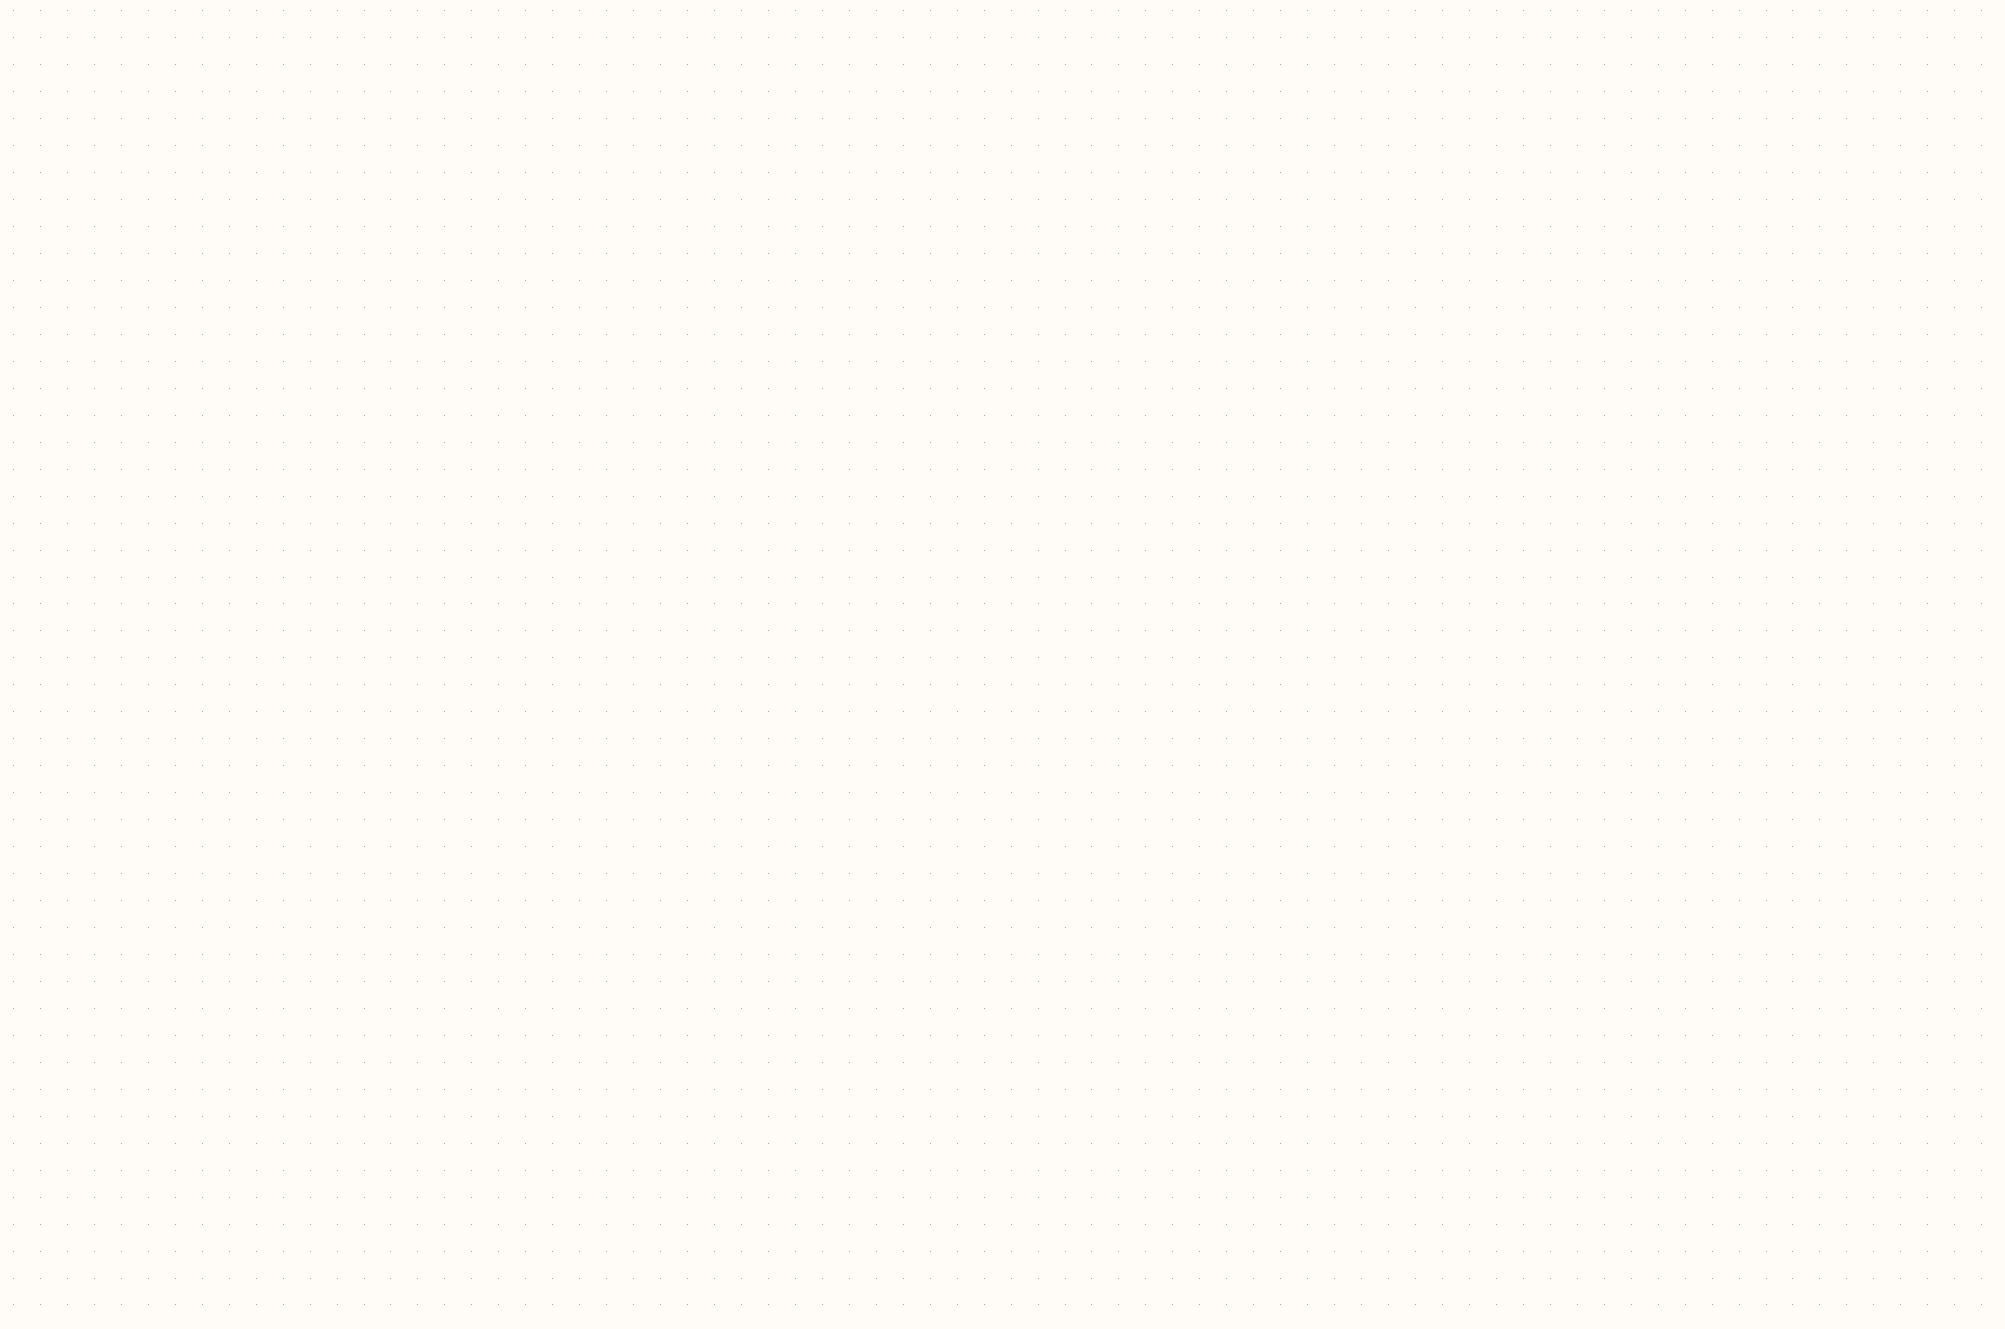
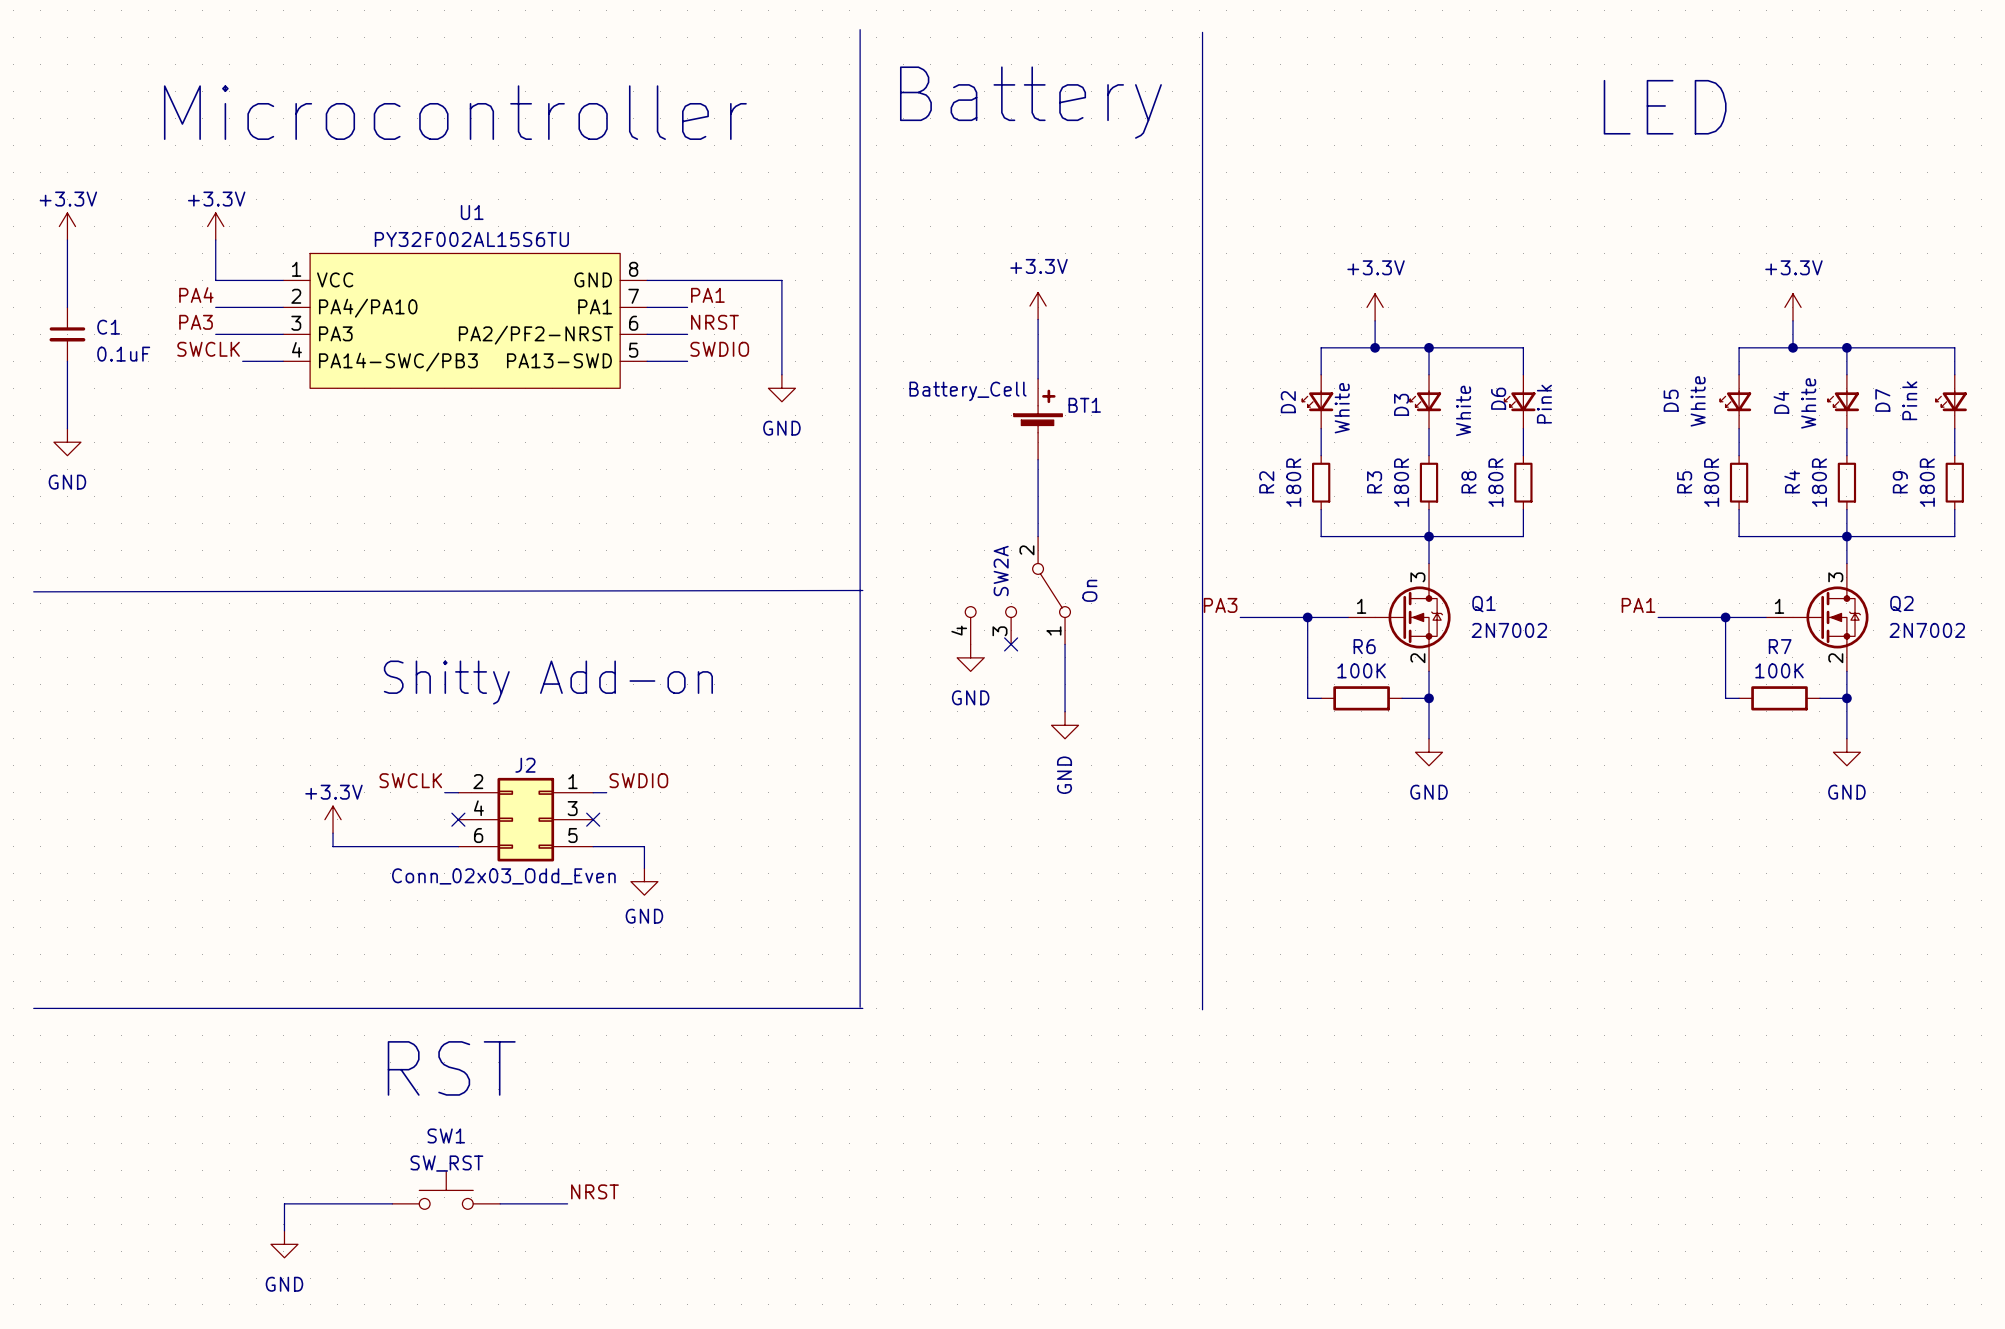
line: none -> (860, 29) (860, 1007)
line: none -> (1202, 32) (1202, 1009)
text: none -> Battery (1030, 102)
text: none -> LED (1665, 107)
text: none -> Microcontroller (455, 112)
power symbol: none -> +3.3V (67, 226)
power symbol: none -> +3.3V (215, 226)
wire: none -> (67, 239) (67, 307)
wire: none -> (215, 239) (215, 280) (283, 280)
wire: none -> (647, 280) (781, 280) (781, 374)
label: none -> PA4 (196, 295)
label: none -> PA1 (707, 295)
power symbol: none -> +3.3V (1038, 306)
wire: none -> (215, 307) (283, 307)
wire: none -> (647, 307) (687, 307)
power symbol: none -> +3.3V (1375, 307)
power symbol: none -> +3.3V (1792, 307)
wire: none -> (1038, 319) (1038, 378)
U1: none -> PY32F002AL15S6TU (465, 320)
wire: none -> (1375, 320) (1375, 347)
wire: none -> (1792, 320) (1792, 347)
label: none -> PA3 (196, 322)
label: none -> NRST (714, 322)
C1: none -> 0.1uF (67, 334)
wire: none -> (215, 334) (283, 334)
wire: none -> (647, 334) (687, 334)
junction: none -> (1375, 347)
wire: none -> (1429, 347) (1429, 374)
junction: none -> (1429, 347)
junction: none -> (1792, 347)
wire: none -> (1846, 347) (1846, 374)
junction: none -> (1846, 347)
label: none -> SWCLK (208, 349)
label: none -> SWDIO (719, 349)
wire: none -> (67, 361) (67, 428)
wire: none -> (242, 361) (283, 361)
wire: none -> (647, 361) (687, 361)
wire: none -> (1321, 374) (1321, 347) (1523, 347) (1523, 374)
wire: none -> (1739, 374) (1739, 347) (1954, 347) (1954, 374)
power symbol: none -> GND (781, 388)
D2: none -> White (1317, 401)
D3: none -> White (1425, 401)
D6: none -> Pink (1520, 401)
D5: none -> White (1735, 401)
D4: none -> White (1843, 401)
D7: none -> Pink (1951, 401)
BT1: none -> Battery_Cell (1038, 419)
wire: none -> (1321, 428) (1321, 455)
wire: none -> (1429, 428) (1429, 455)
wire: none -> (1523, 428) (1523, 455)
wire: none -> (1739, 428) (1739, 455)
wire: none -> (1846, 428) (1846, 455)
wire: none -> (1954, 428) (1954, 455)
power symbol: none -> GND (67, 442)
wire: none -> (1038, 459) (1038, 536)
R2: none -> 180R (1321, 482)
R3: none -> 180R (1429, 482)
R8: none -> 180R (1523, 482)
R5: none -> 180R (1739, 482)
R4: none -> 180R (1846, 482)
R9: none -> 180R (1954, 482)
wire: none -> (1321, 509) (1321, 536) (1523, 536) (1523, 509)
wire: none -> (1429, 509) (1429, 563)
wire: none -> (1739, 509) (1739, 536) (1954, 536) (1954, 509)
wire: none -> (1846, 509) (1846, 563)
junction: none -> (1429, 536)
junction: none -> (1846, 536)
line: none -> (862, 590) (33, 591)
SW2A: none -> On (1017, 590)
label: none -> PA3 (1220, 605)
label: none -> PA1 (1638, 605)
wire: none -> (1240, 617) (1348, 617)
wire: none -> (1307, 617) (1307, 698) (1321, 698)
junction: none -> (1307, 617)
Q1: none -> 2N7002 (1399, 617)
wire: none -> (1658, 617) (1766, 617)
wire: none -> (1725, 617) (1725, 698) (1739, 698)
junction: none -> (1725, 617)
Q2: none -> 2N7002 (1817, 617)
no-connect mark: none -> (1011, 644)
wire: none -> (1065, 644) (1065, 711)
power symbol: none -> GND (970, 657)
wire: none -> (1429, 671) (1429, 738)
wire: none -> (1846, 671) (1846, 738)
text: none -> Shitty Add-on (548, 682)
R6: none -> 100K (1361, 698)
wire: none -> (1402, 698) (1429, 698)
junction: none -> (1429, 698)
R7: none -> 100K (1779, 698)
wire: none -> (1819, 698) (1846, 698)
junction: none -> (1846, 698)
power symbol: none -> GND (1065, 725)
power symbol: none -> GND (1429, 752)
power symbol: none -> GND (1846, 752)
label: none -> SWCLK (410, 780)
label: none -> SWDIO (638, 780)
wire: none -> (444, 792) (458, 792)
wire: none -> (593, 792) (606, 792)
power symbol: none -> +3.3V (333, 819)
no-connect mark: none -> (458, 819)
J2: none -> Conn_02x03_Odd_Even (525, 819)
no-connect mark: none -> (593, 819)
wire: none -> (333, 833) (333, 846) (458, 846)
wire: none -> (593, 846) (644, 846) (644, 868)
power symbol: none -> GND (644, 881)
line: none -> (33, 1008) (862, 1008)
text: none -> RST (451, 1068)
SW1: none -> SW_RST (446, 1190)
label: none -> NRST (594, 1191)
wire: none -> (392, 1203) (284, 1203) (284, 1230)
wire: none -> (500, 1203) (567, 1203)
power symbol: none -> GND (284, 1244)

